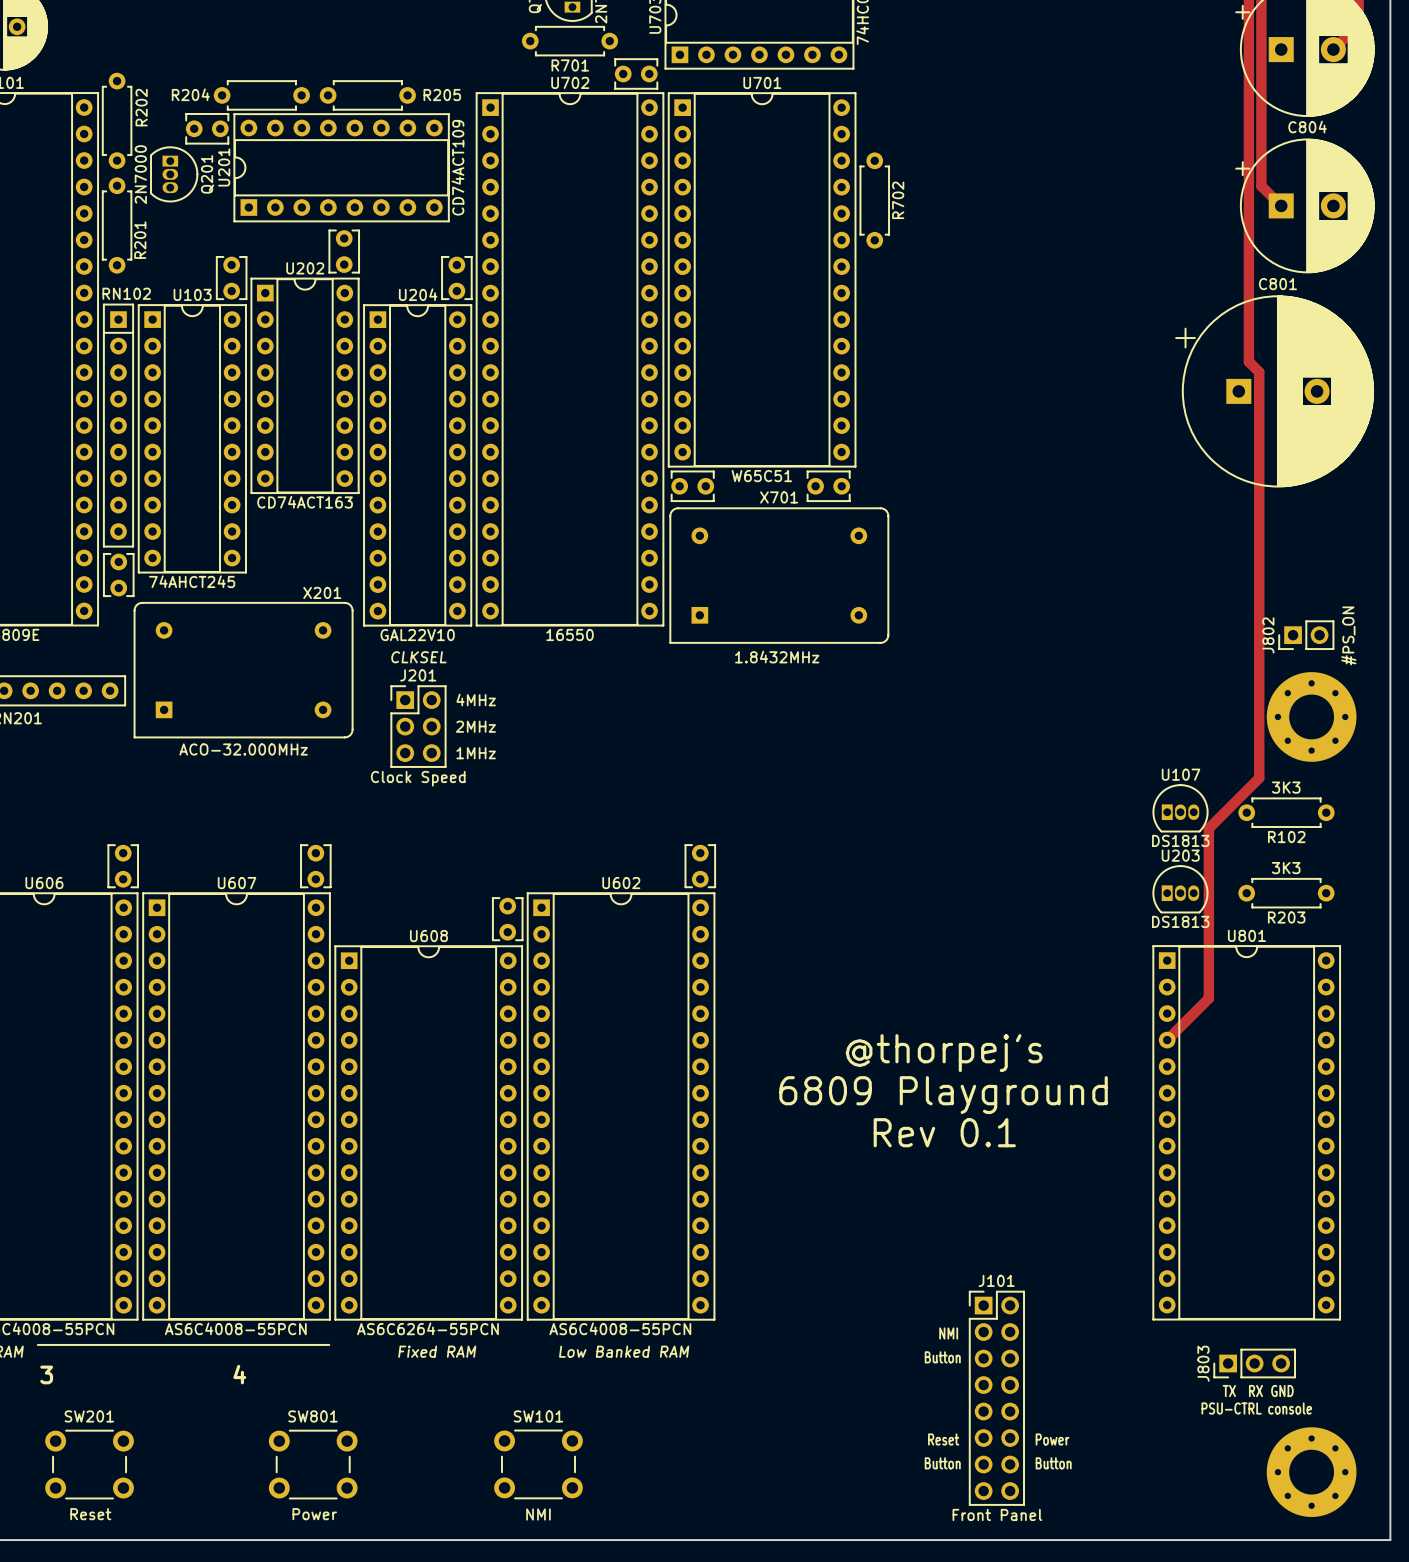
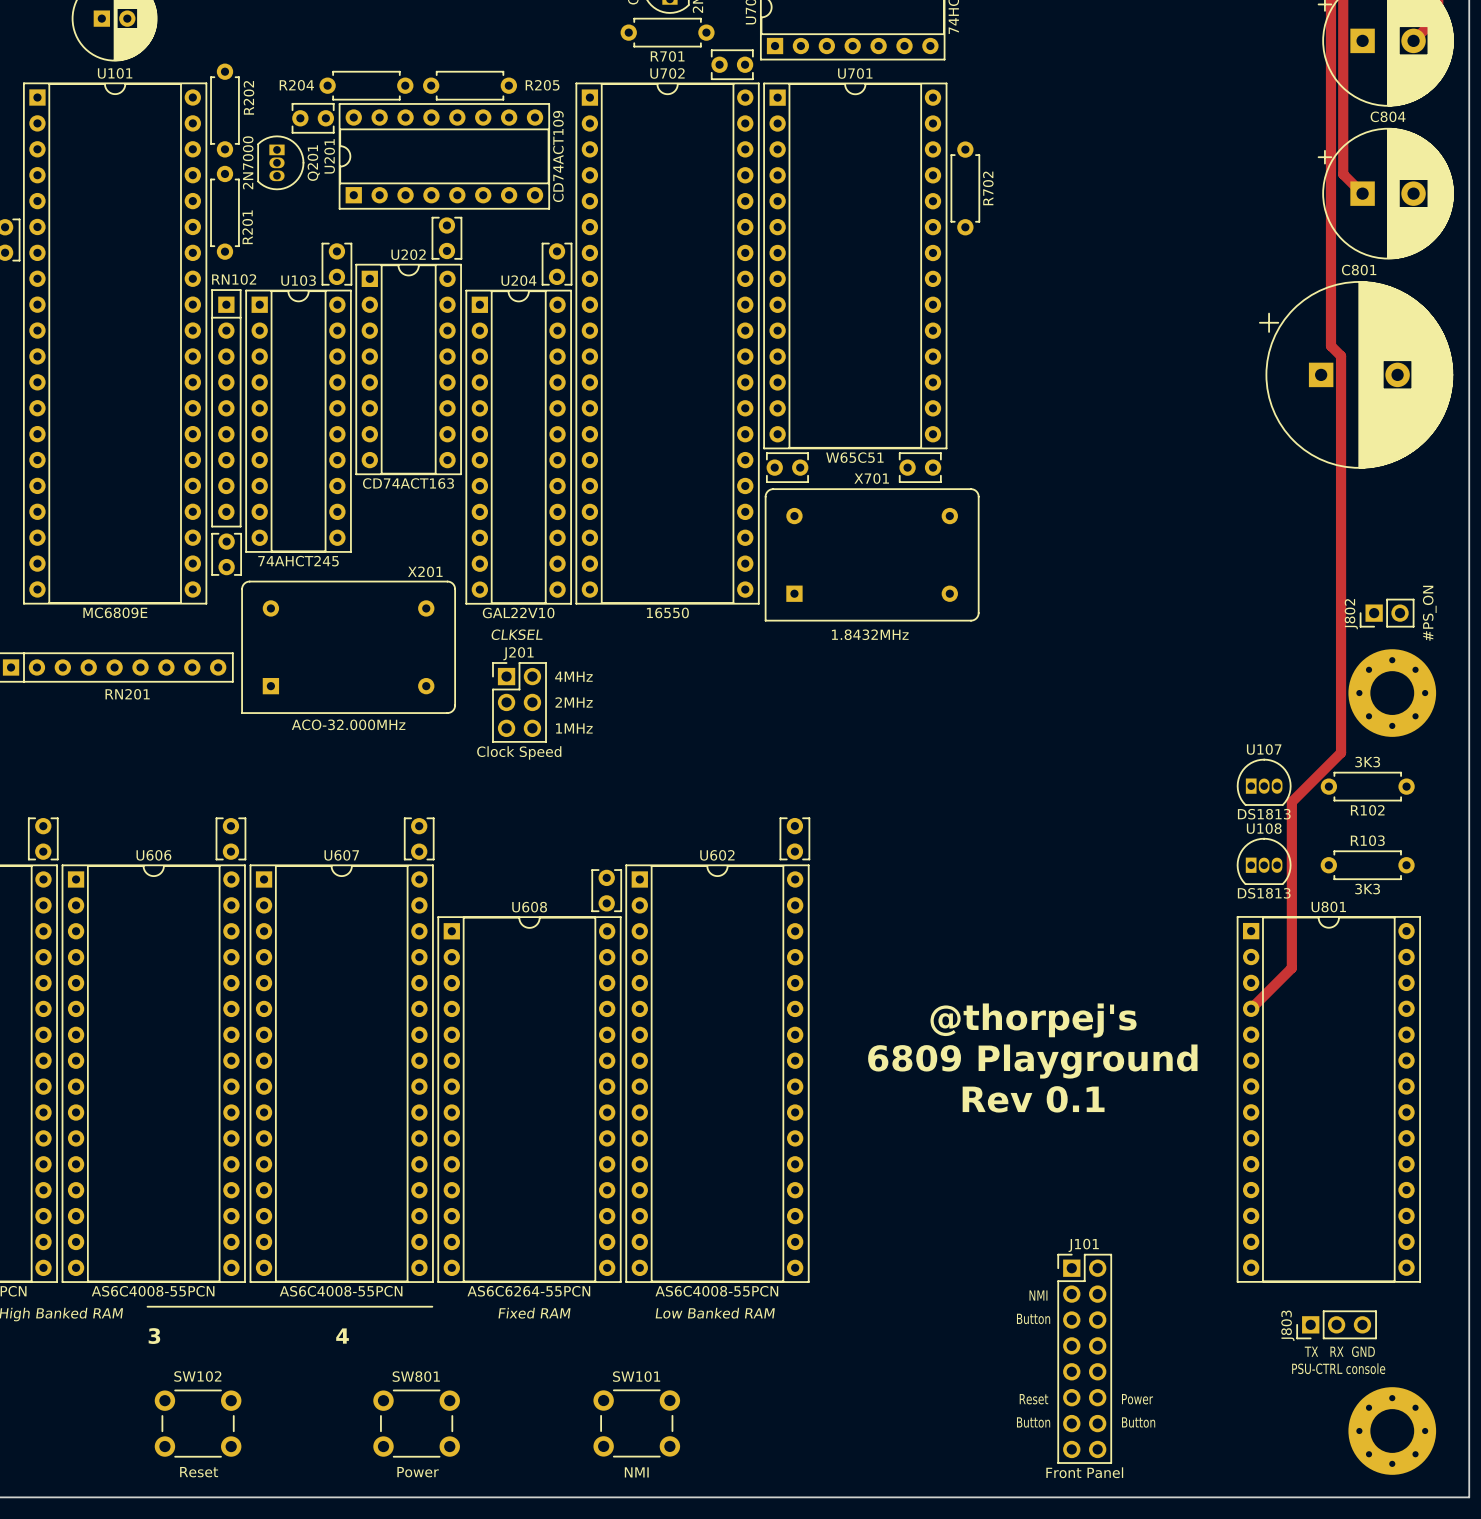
U203 name: U203 (1180, 855) -> U108 (1264, 828)
R203 value position: 3K3 (1286, 868) -> 3K3 (1367, 889)
R203 name: R203 (1286, 917) -> R103 (1367, 840)
SW201 name: SW201 (89, 1416) -> SW102 (197, 1376)

